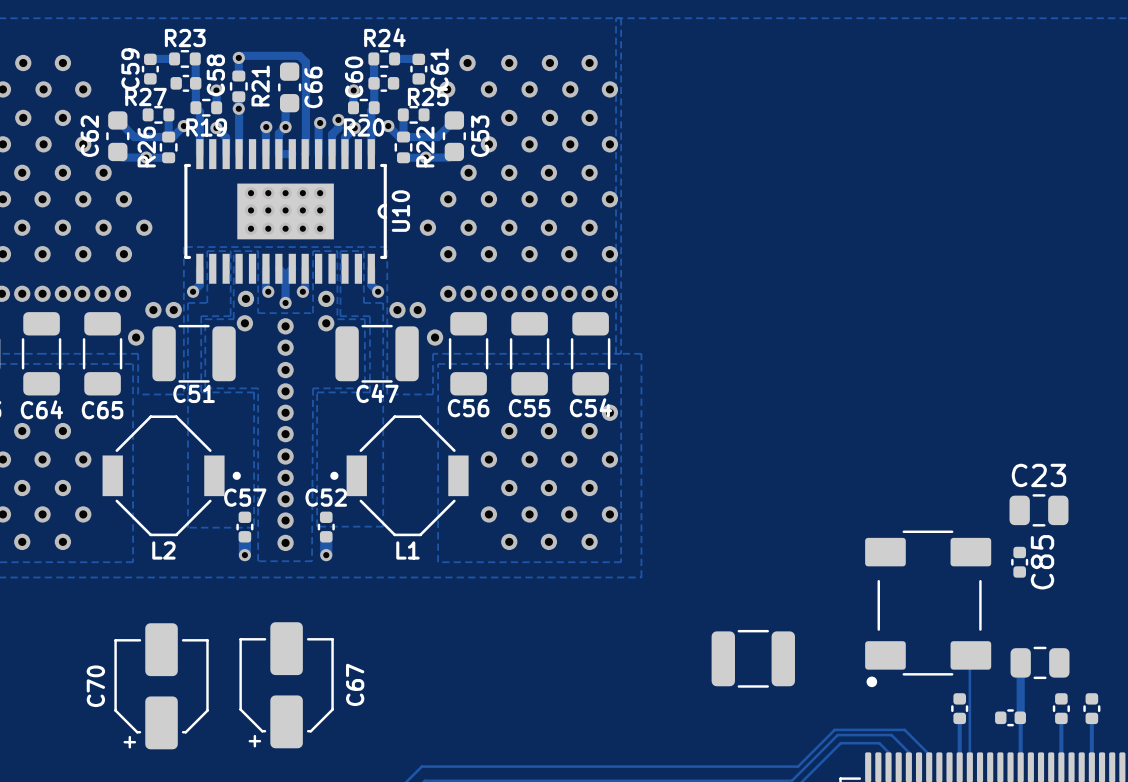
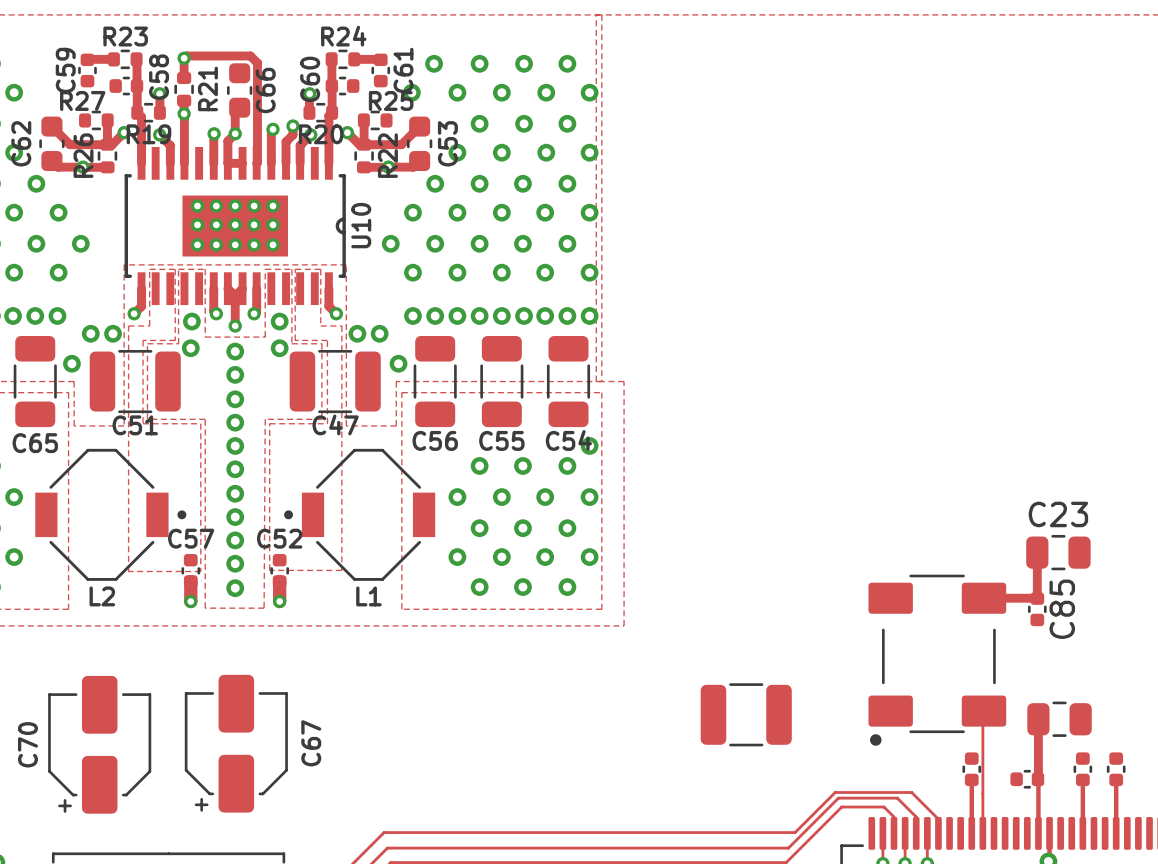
track: none -> (1037, 552) (1037, 598) (983, 598)

